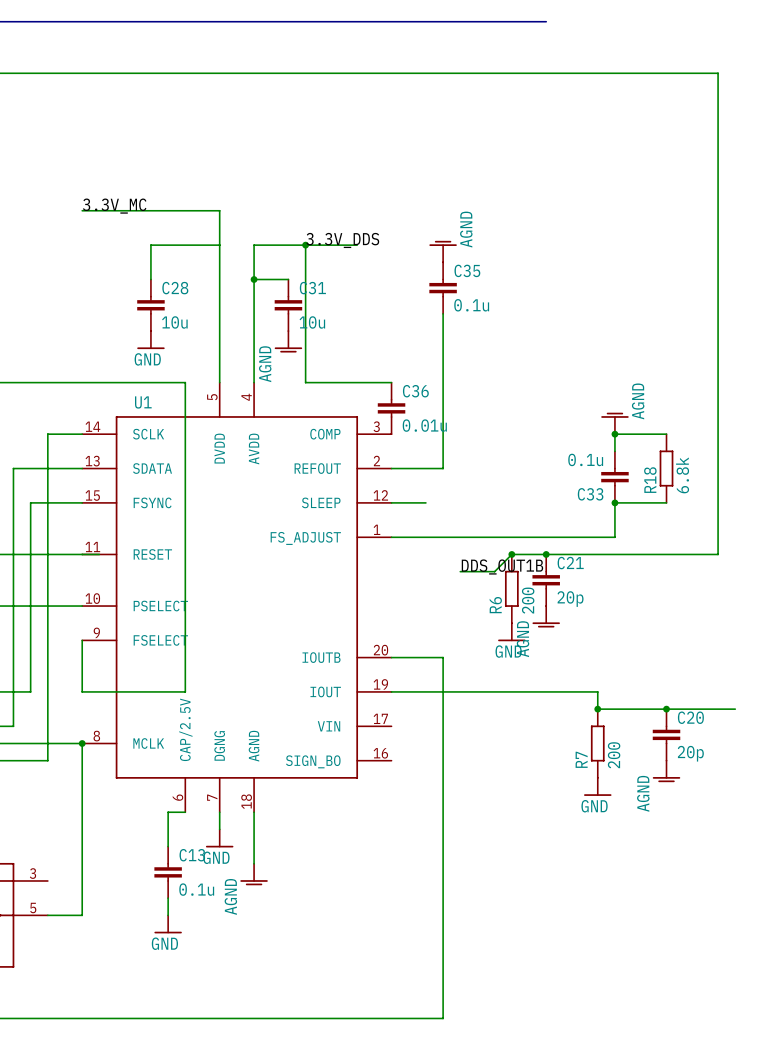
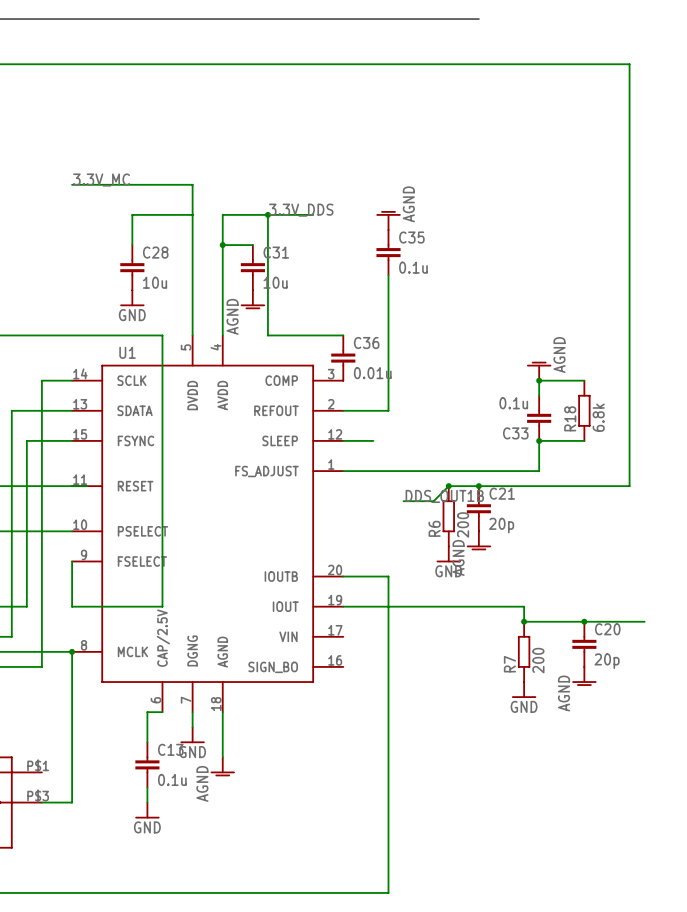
part pin number: 3 (32, 873) -> P$1 (38, 765)
part pin number: 5 (33, 908) -> P$3 (38, 796)

